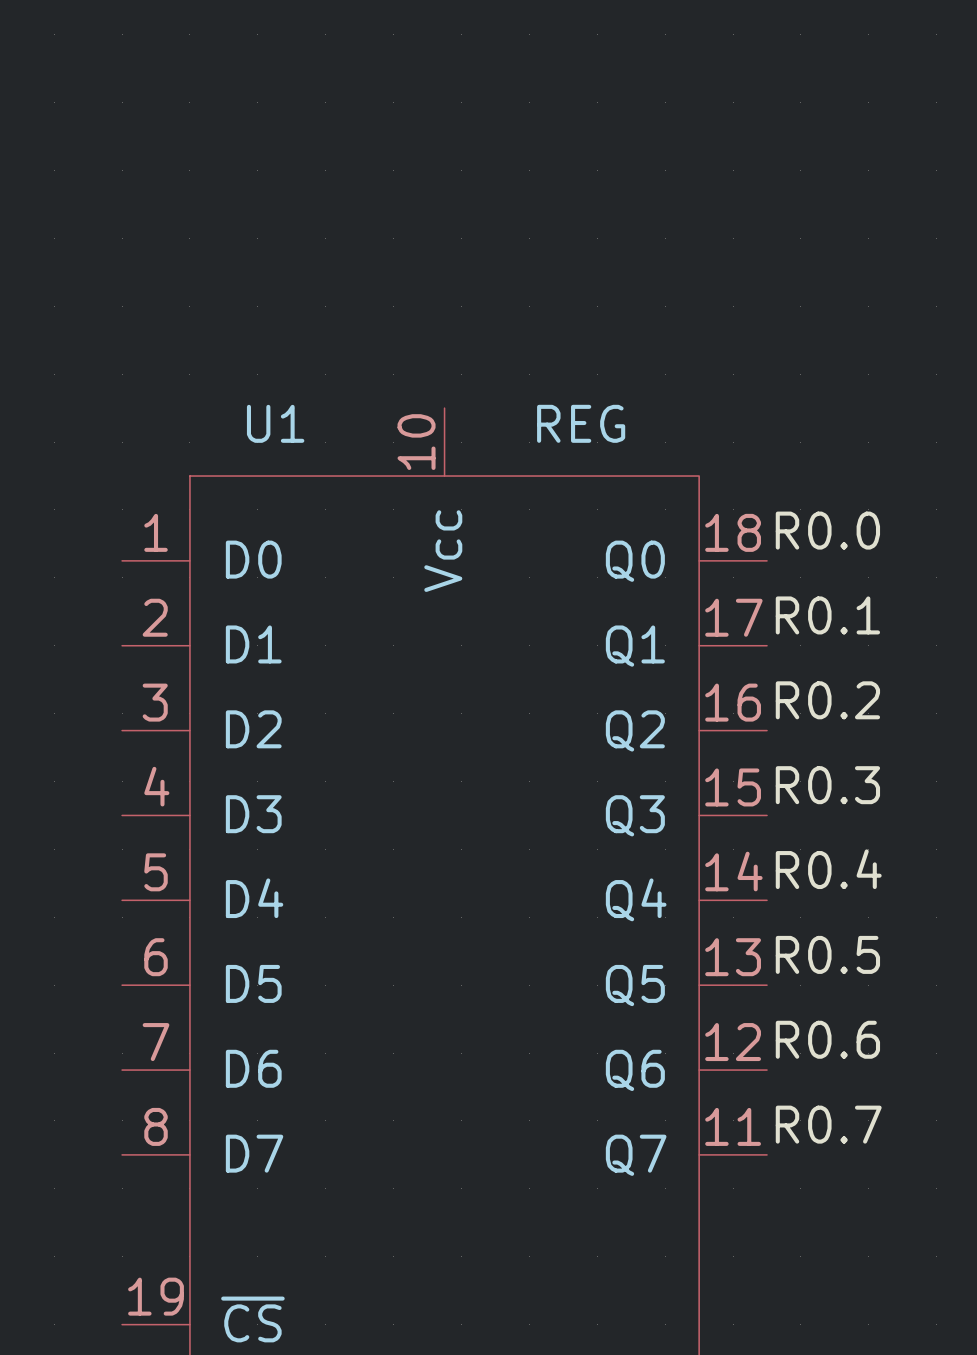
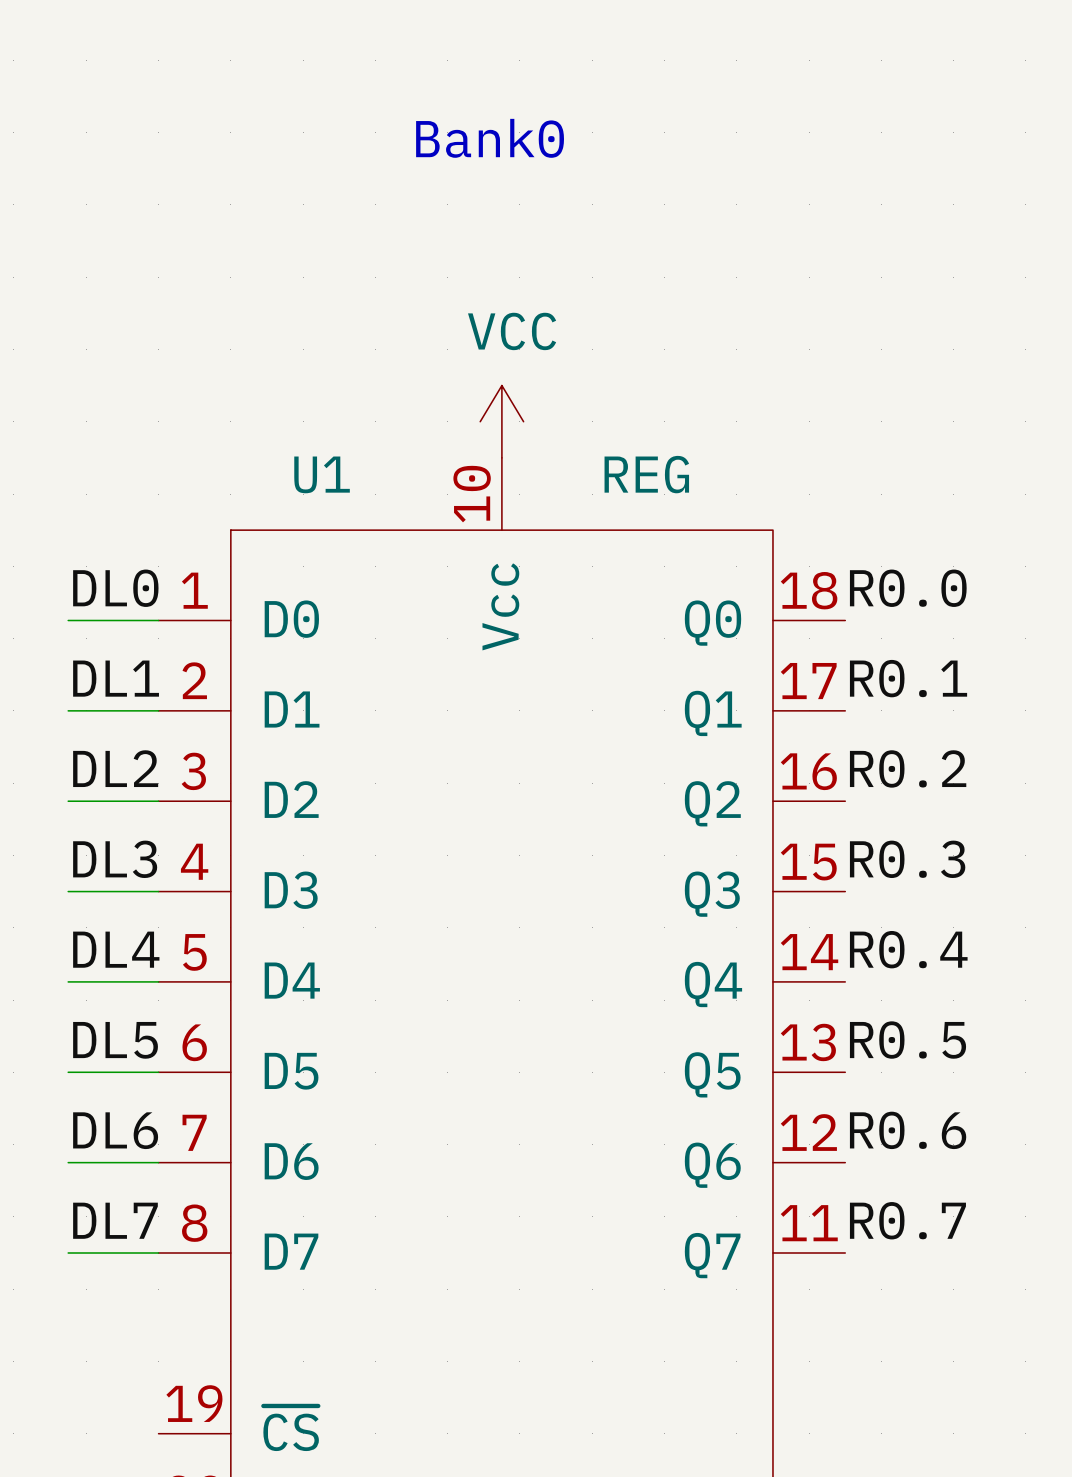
text: none -> Bank0 (490, 138)
power symbol: none -> VCC (501, 421)
label: none -> DL0 (115, 588)
wire: none -> (68, 620) (158, 620)
label: none -> DL1 (116, 678)
wire: none -> (68, 710) (158, 710)
label: none -> DL2 (115, 768)
wire: none -> (68, 801) (158, 801)
label: none -> DL3 (115, 859)
wire: none -> (68, 891) (158, 891)
label: none -> DL4 (116, 949)
wire: none -> (68, 981) (158, 981)
label: none -> DL5 (115, 1040)
wire: none -> (68, 1072) (158, 1072)
label: none -> DL6 (115, 1130)
wire: none -> (68, 1162) (158, 1162)
label: none -> DL7 (115, 1220)
wire: none -> (68, 1252) (158, 1252)

